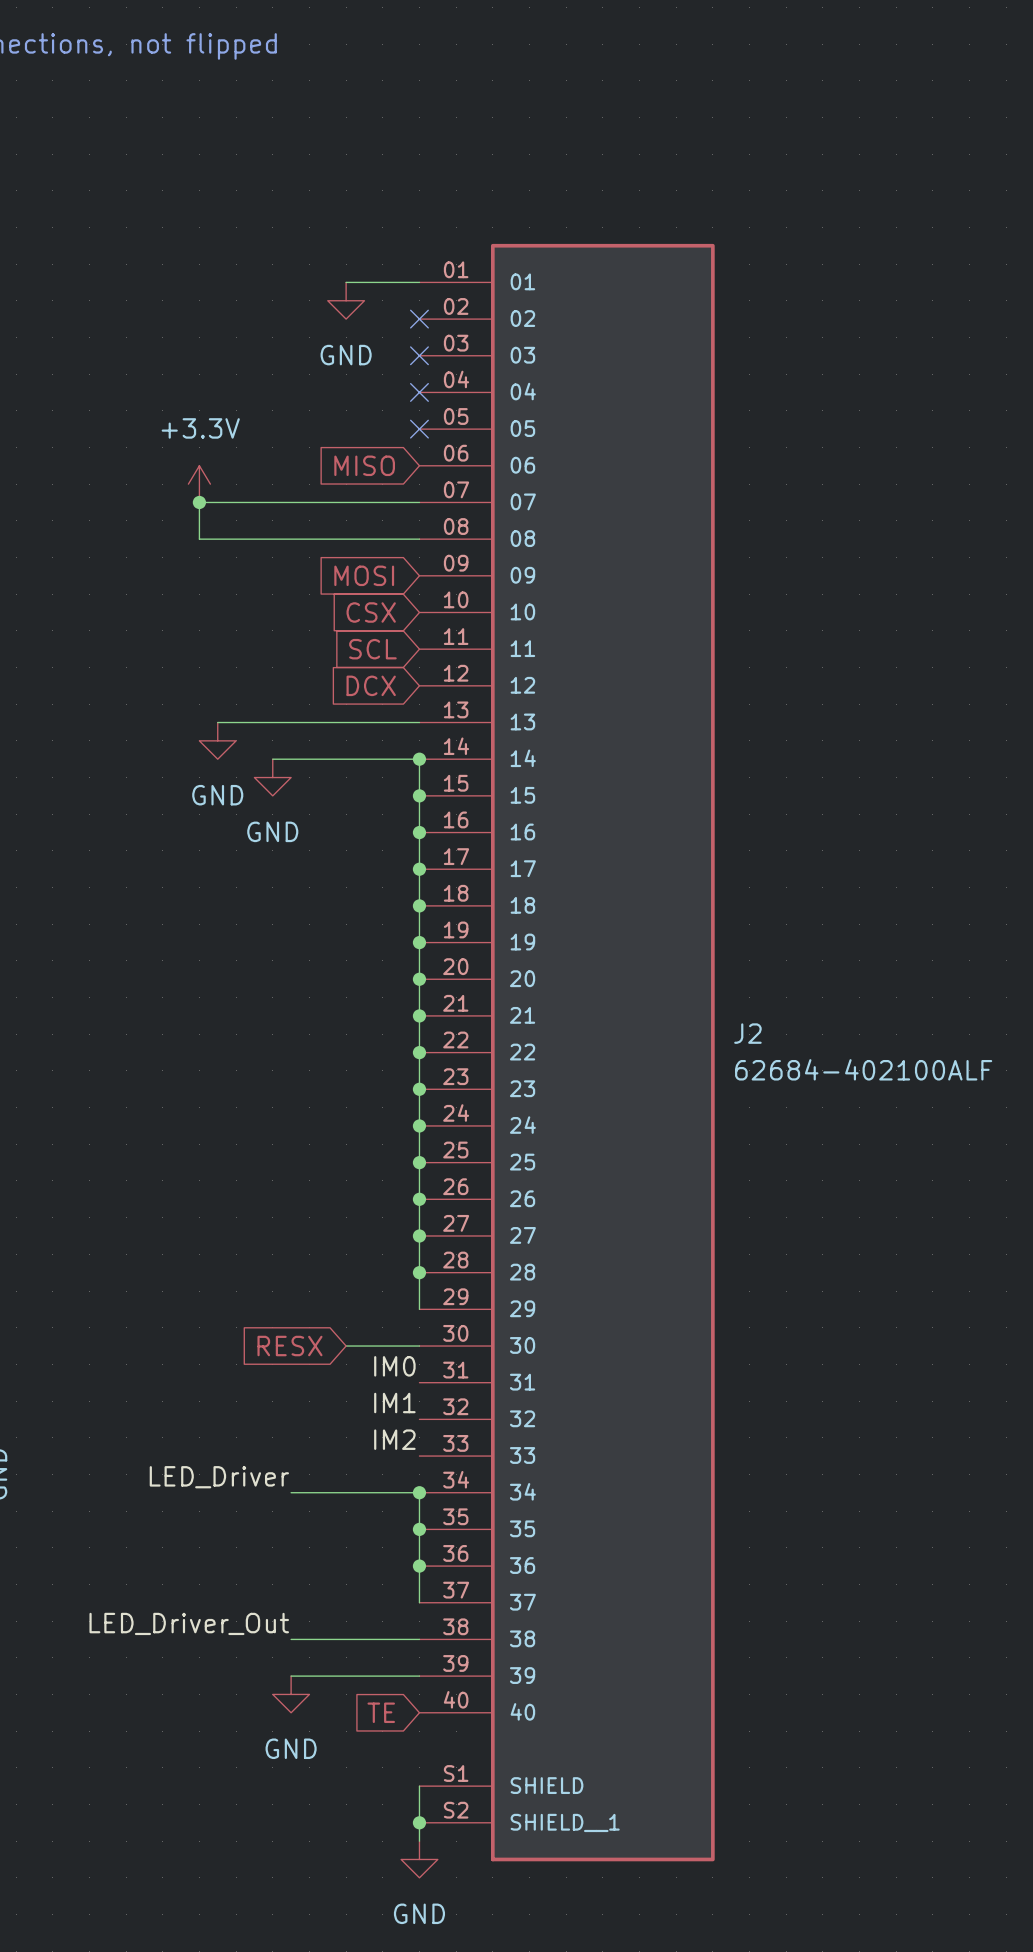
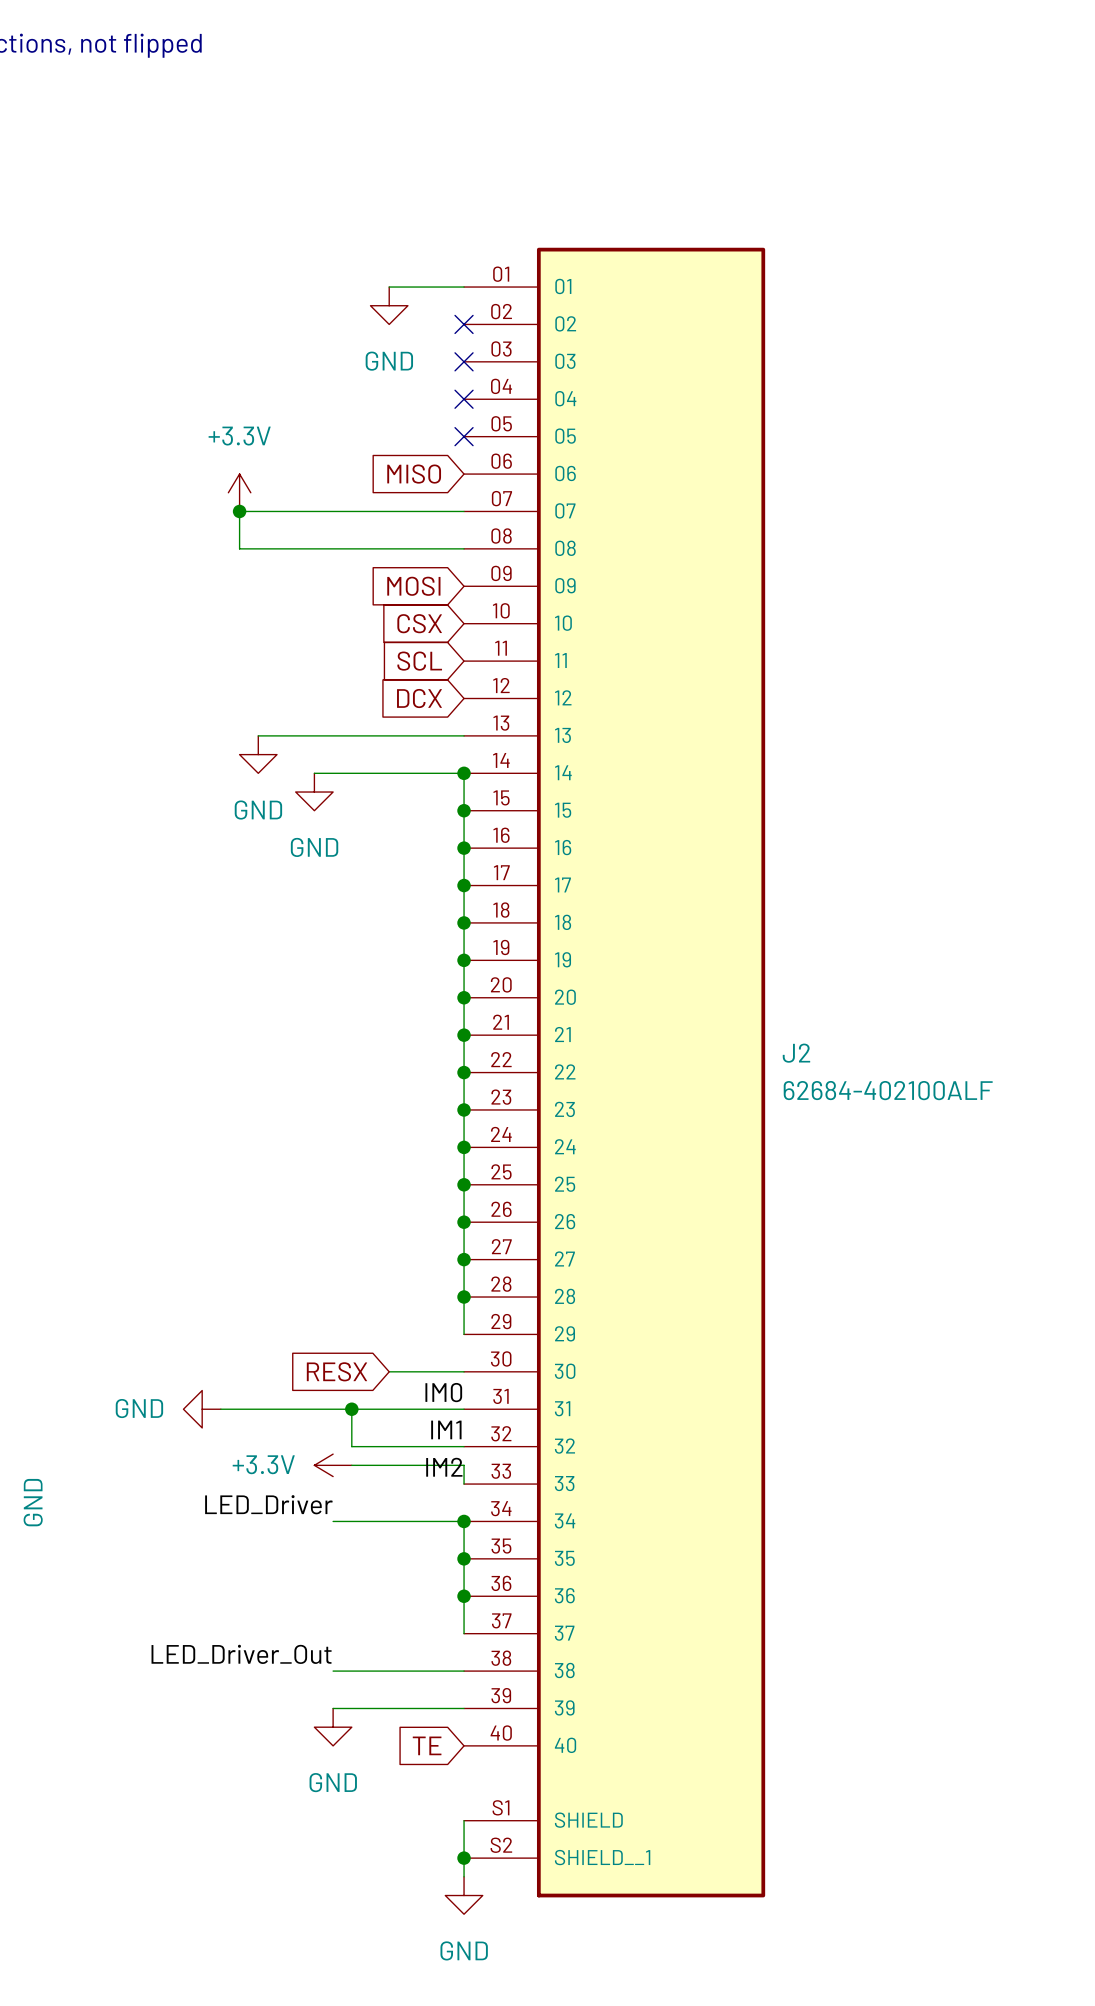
power symbol: none -> GND (202, 1409)
wire: none -> (220, 1409) (464, 1409)
wire: none -> (351, 1409) (351, 1446) (464, 1446)
junction: none -> (351, 1409)
power symbol: none -> +3.3V (333, 1465)
wire: none -> (351, 1465) (464, 1465) (464, 1484)

